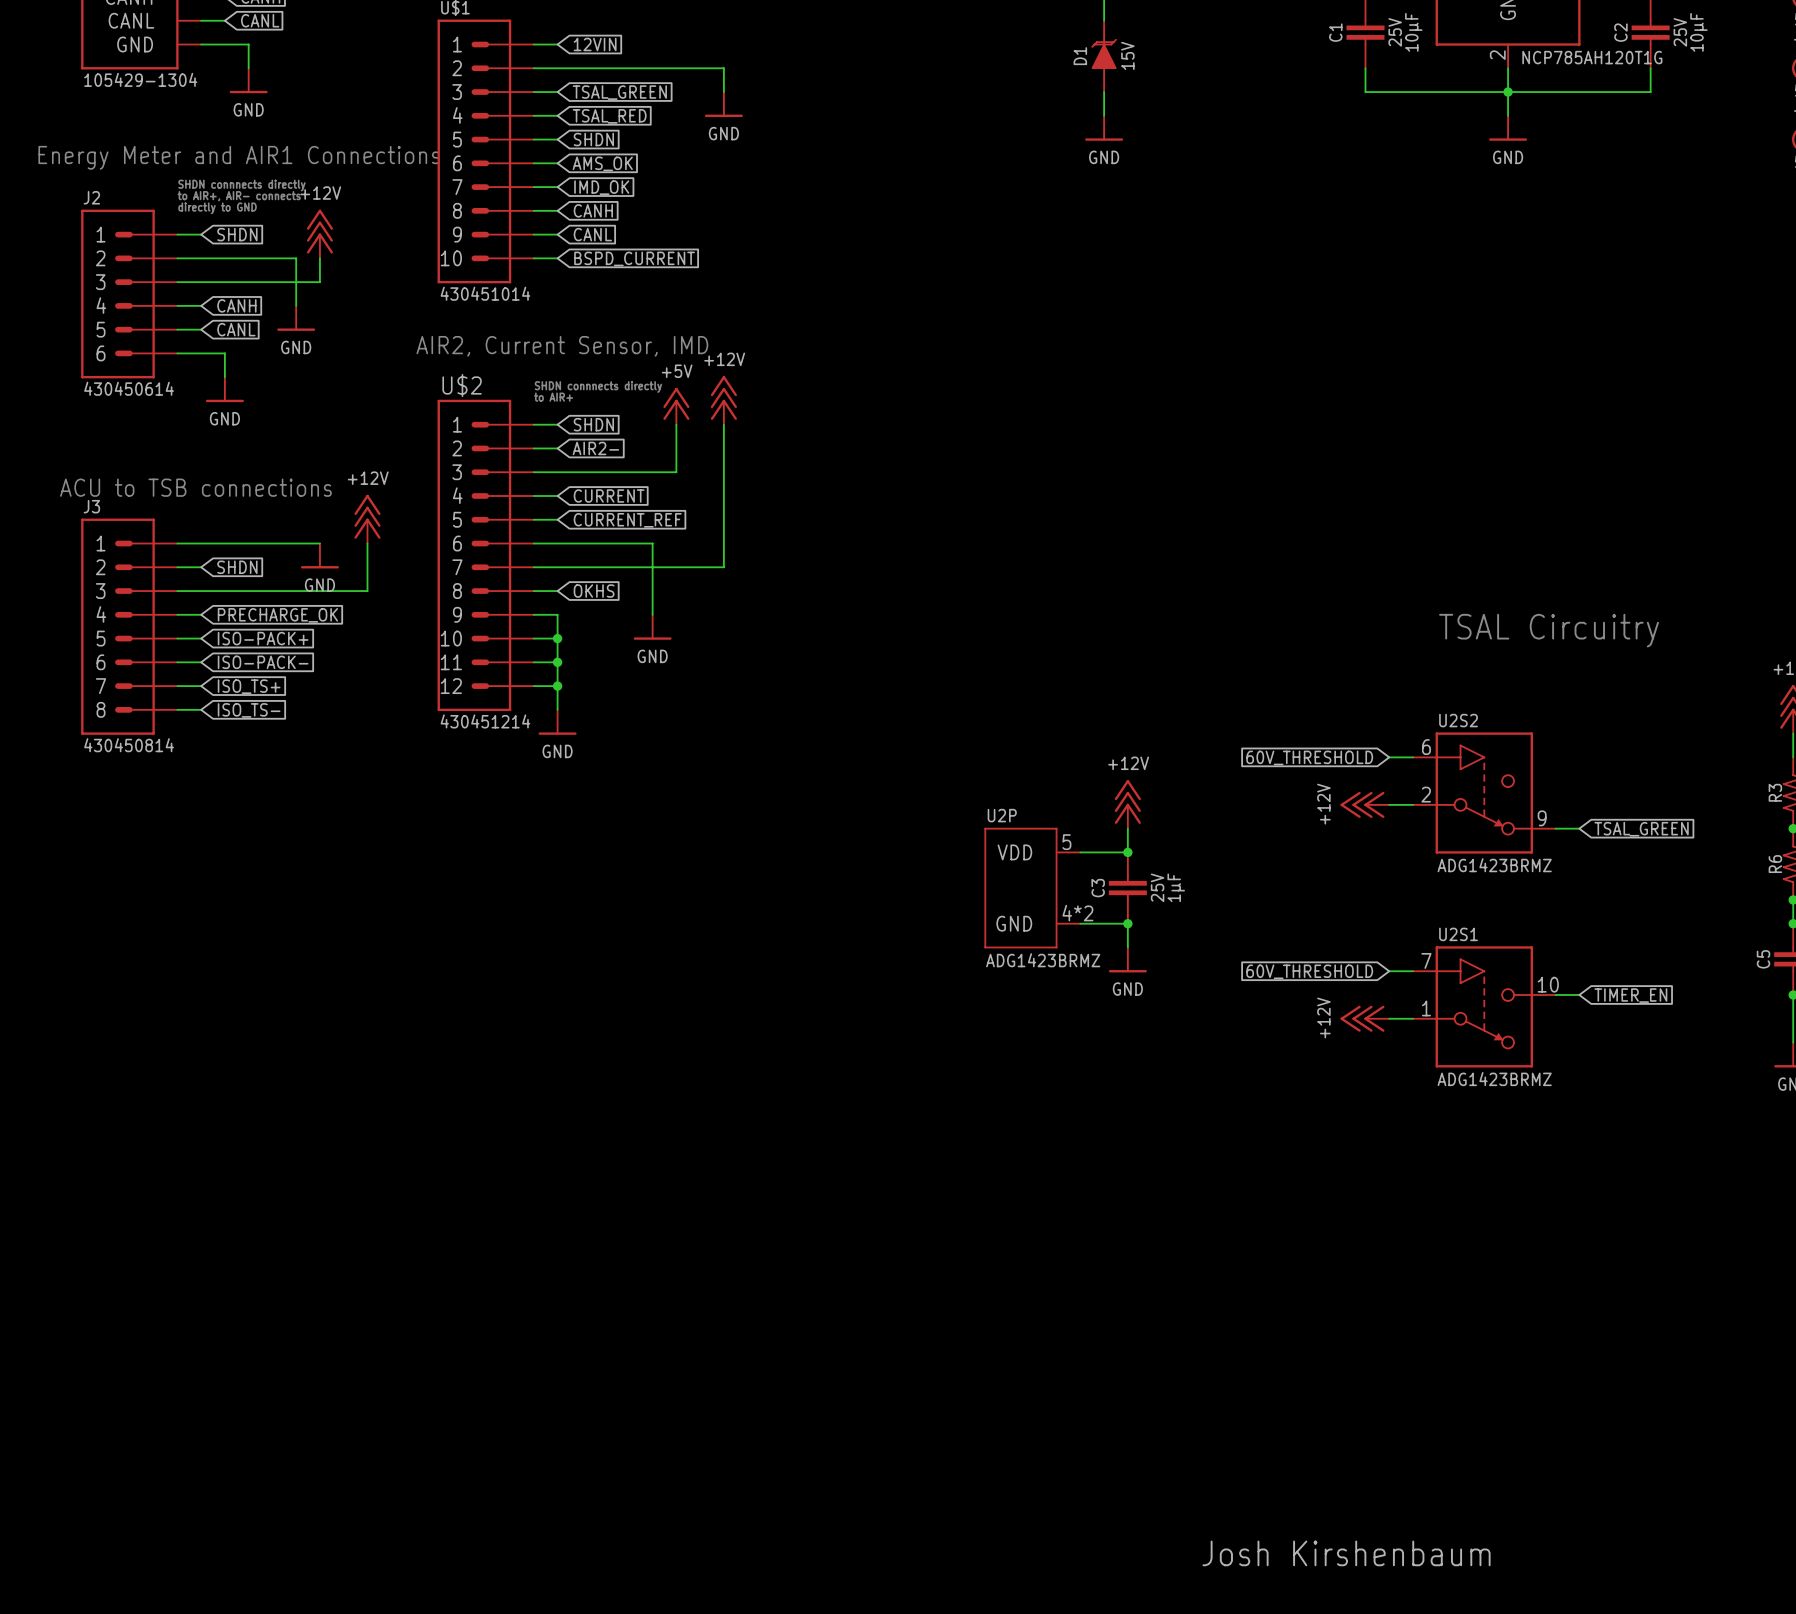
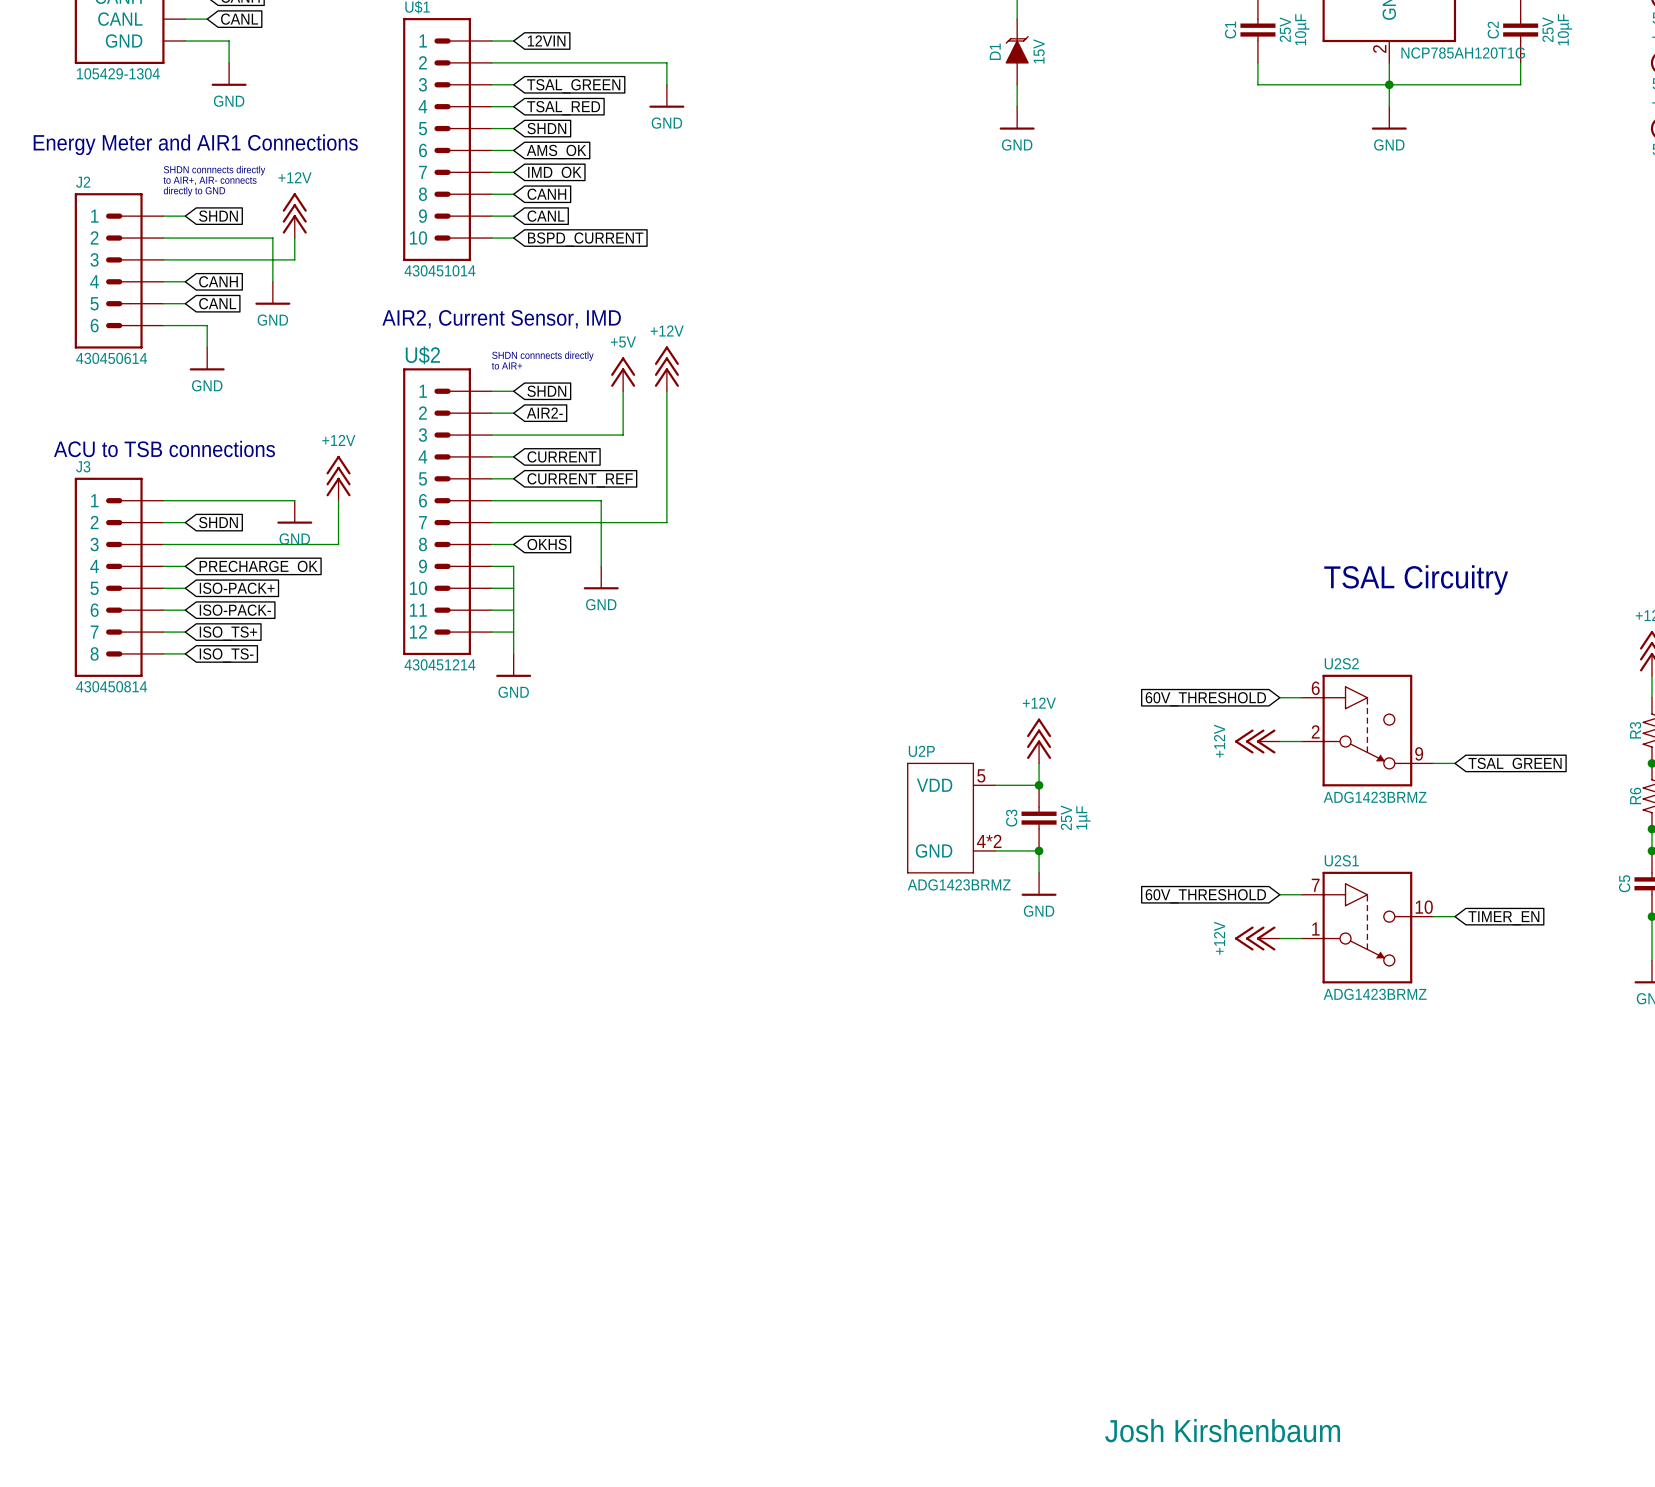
junction: (557, 638) -> none
junction: (557, 662) -> none
junction: (557, 686) -> none

